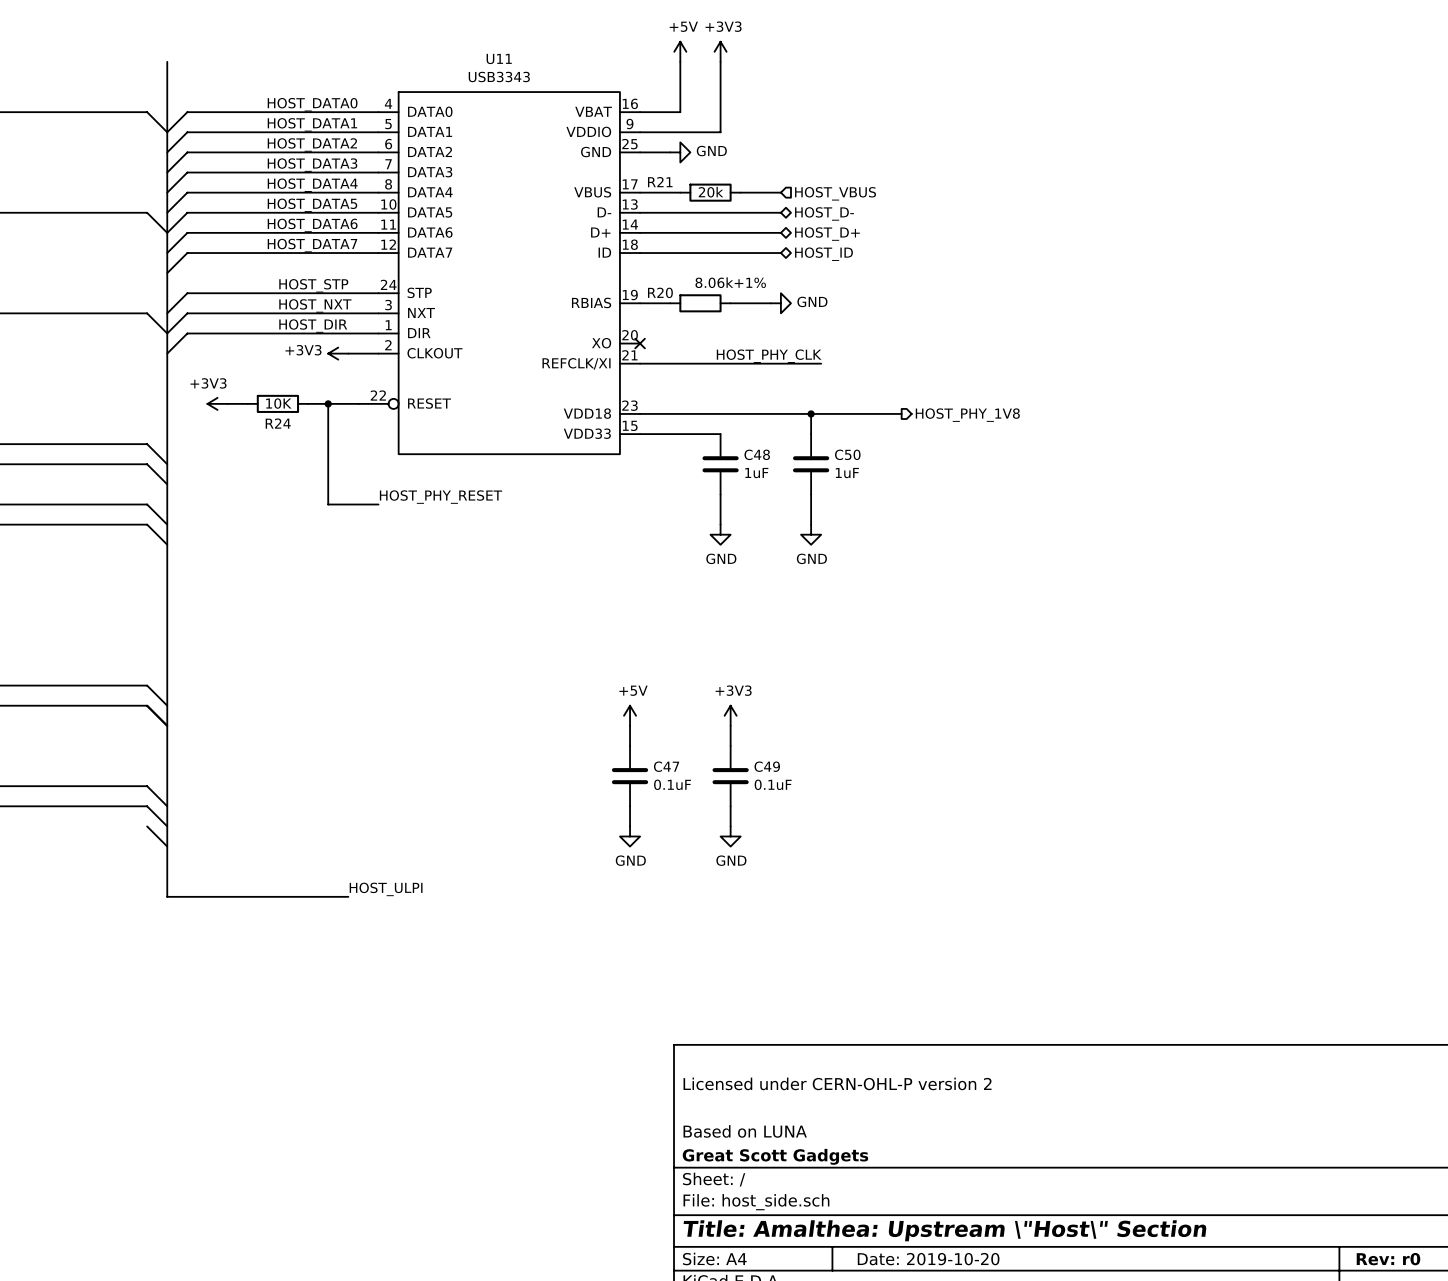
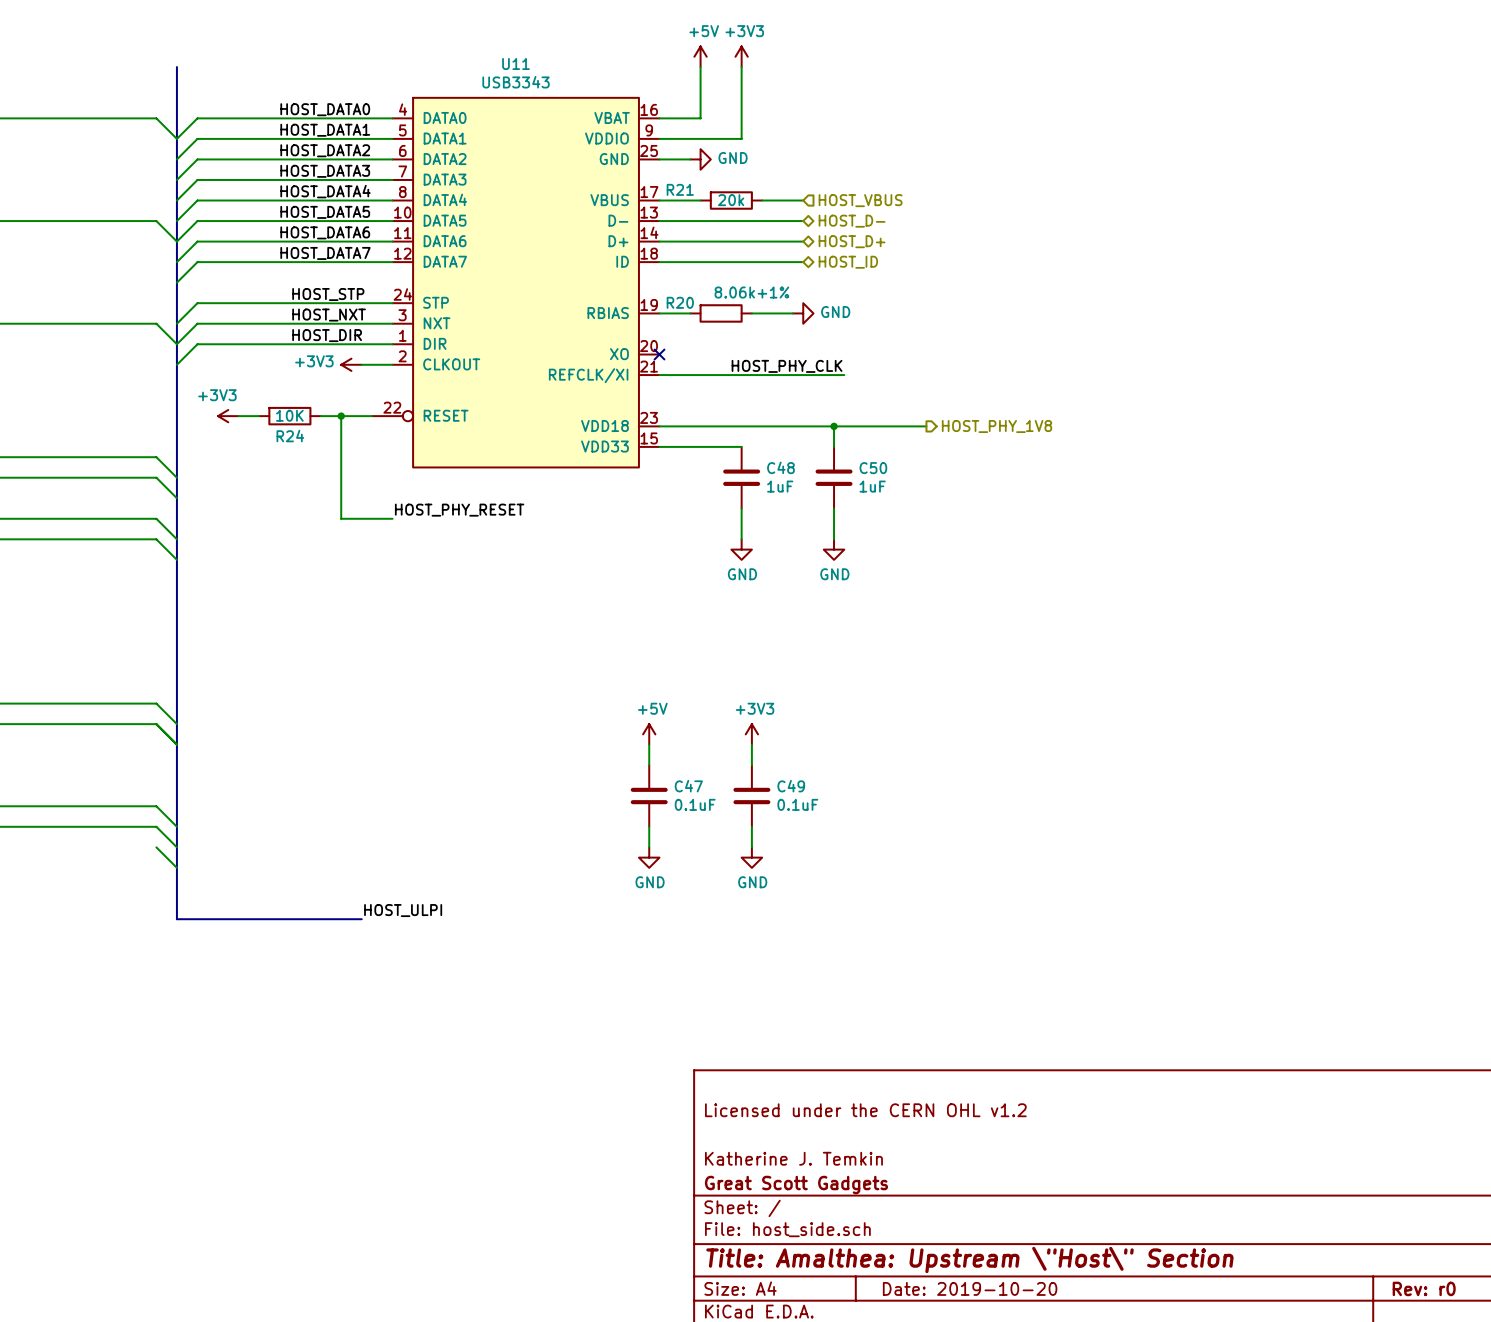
title block: Licensed under CERN-OHL-P version 2 (837, 1083) -> Licensed under the CERN OHL v1.2 (865, 1110)
title block: Based on LUNA (745, 1131) -> Katherine J. Temkin (793, 1158)

